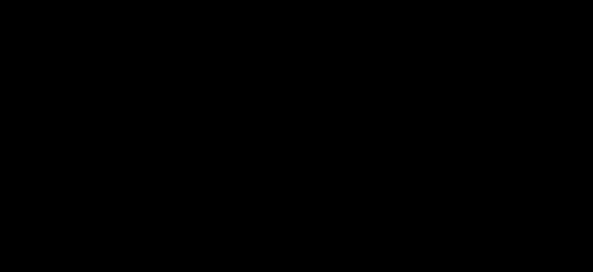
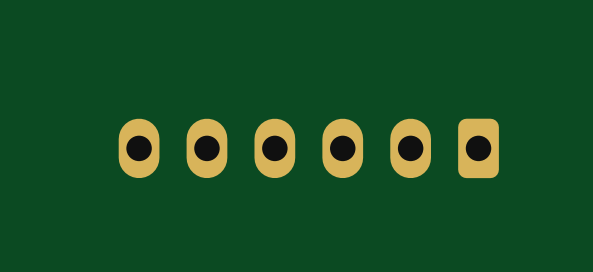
part: none -> (308, 148)

